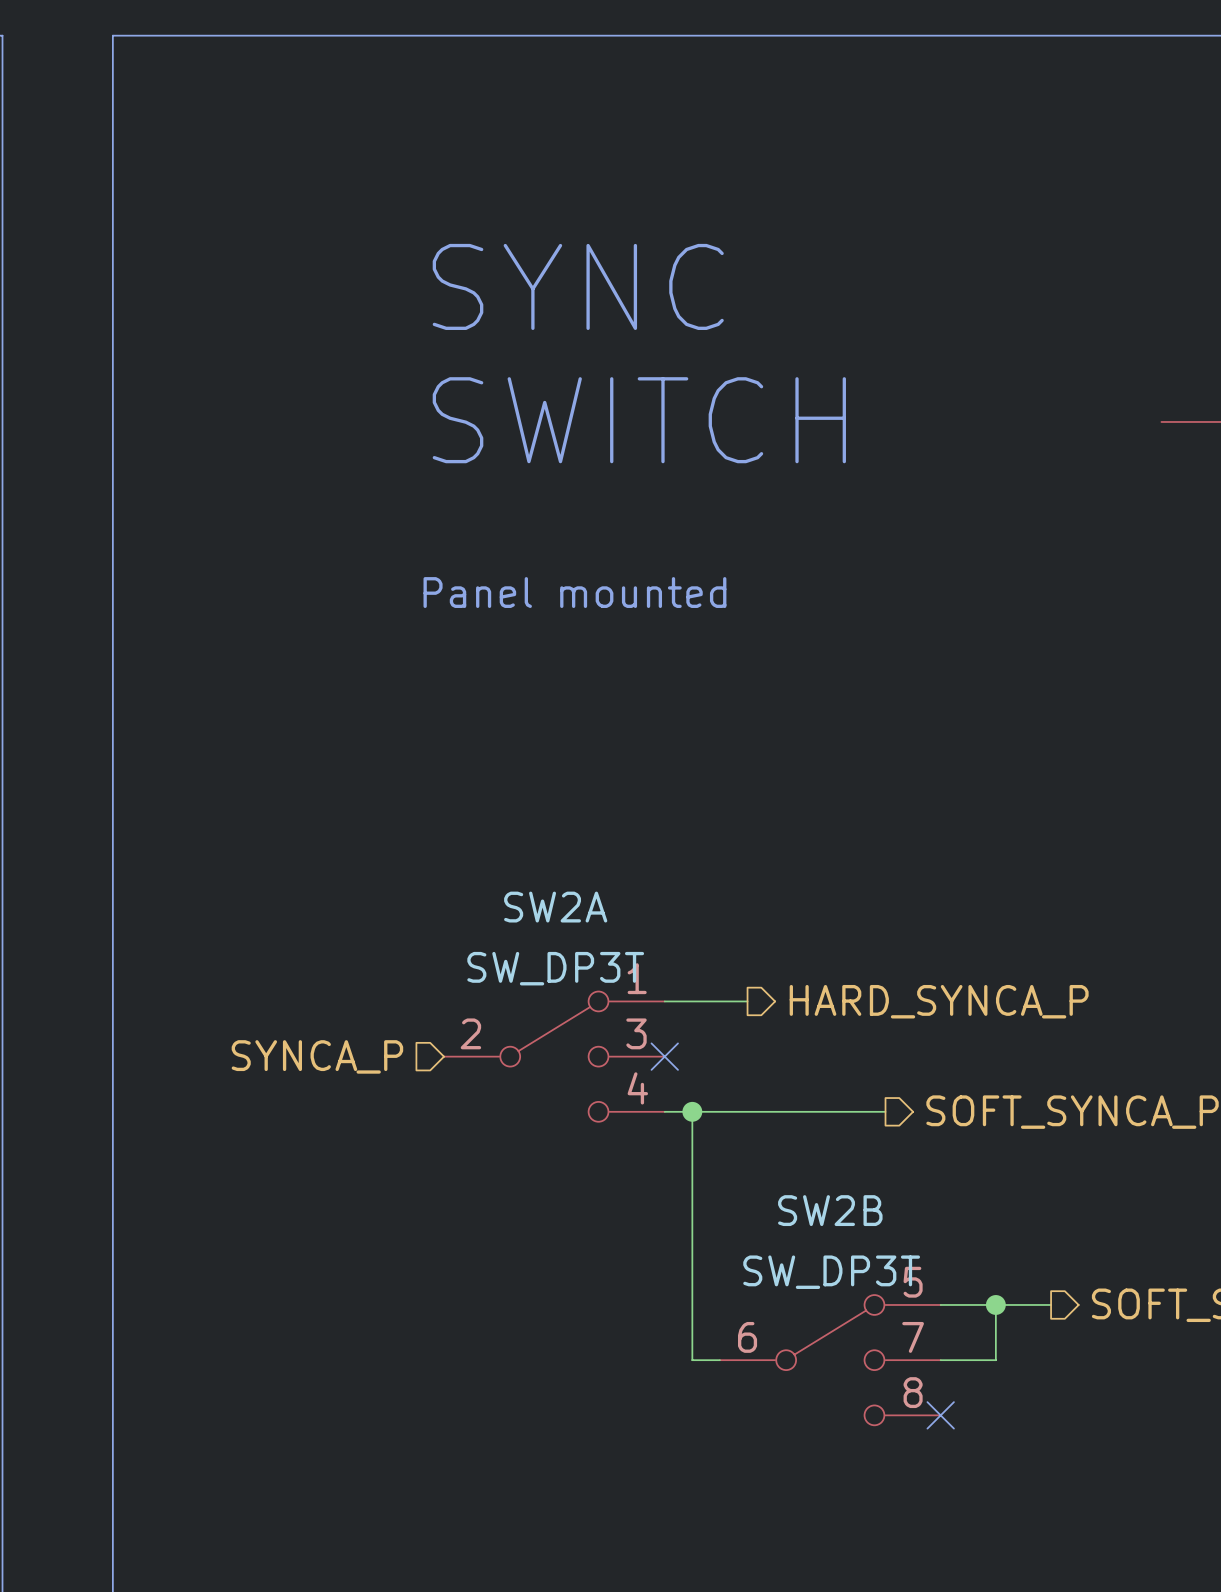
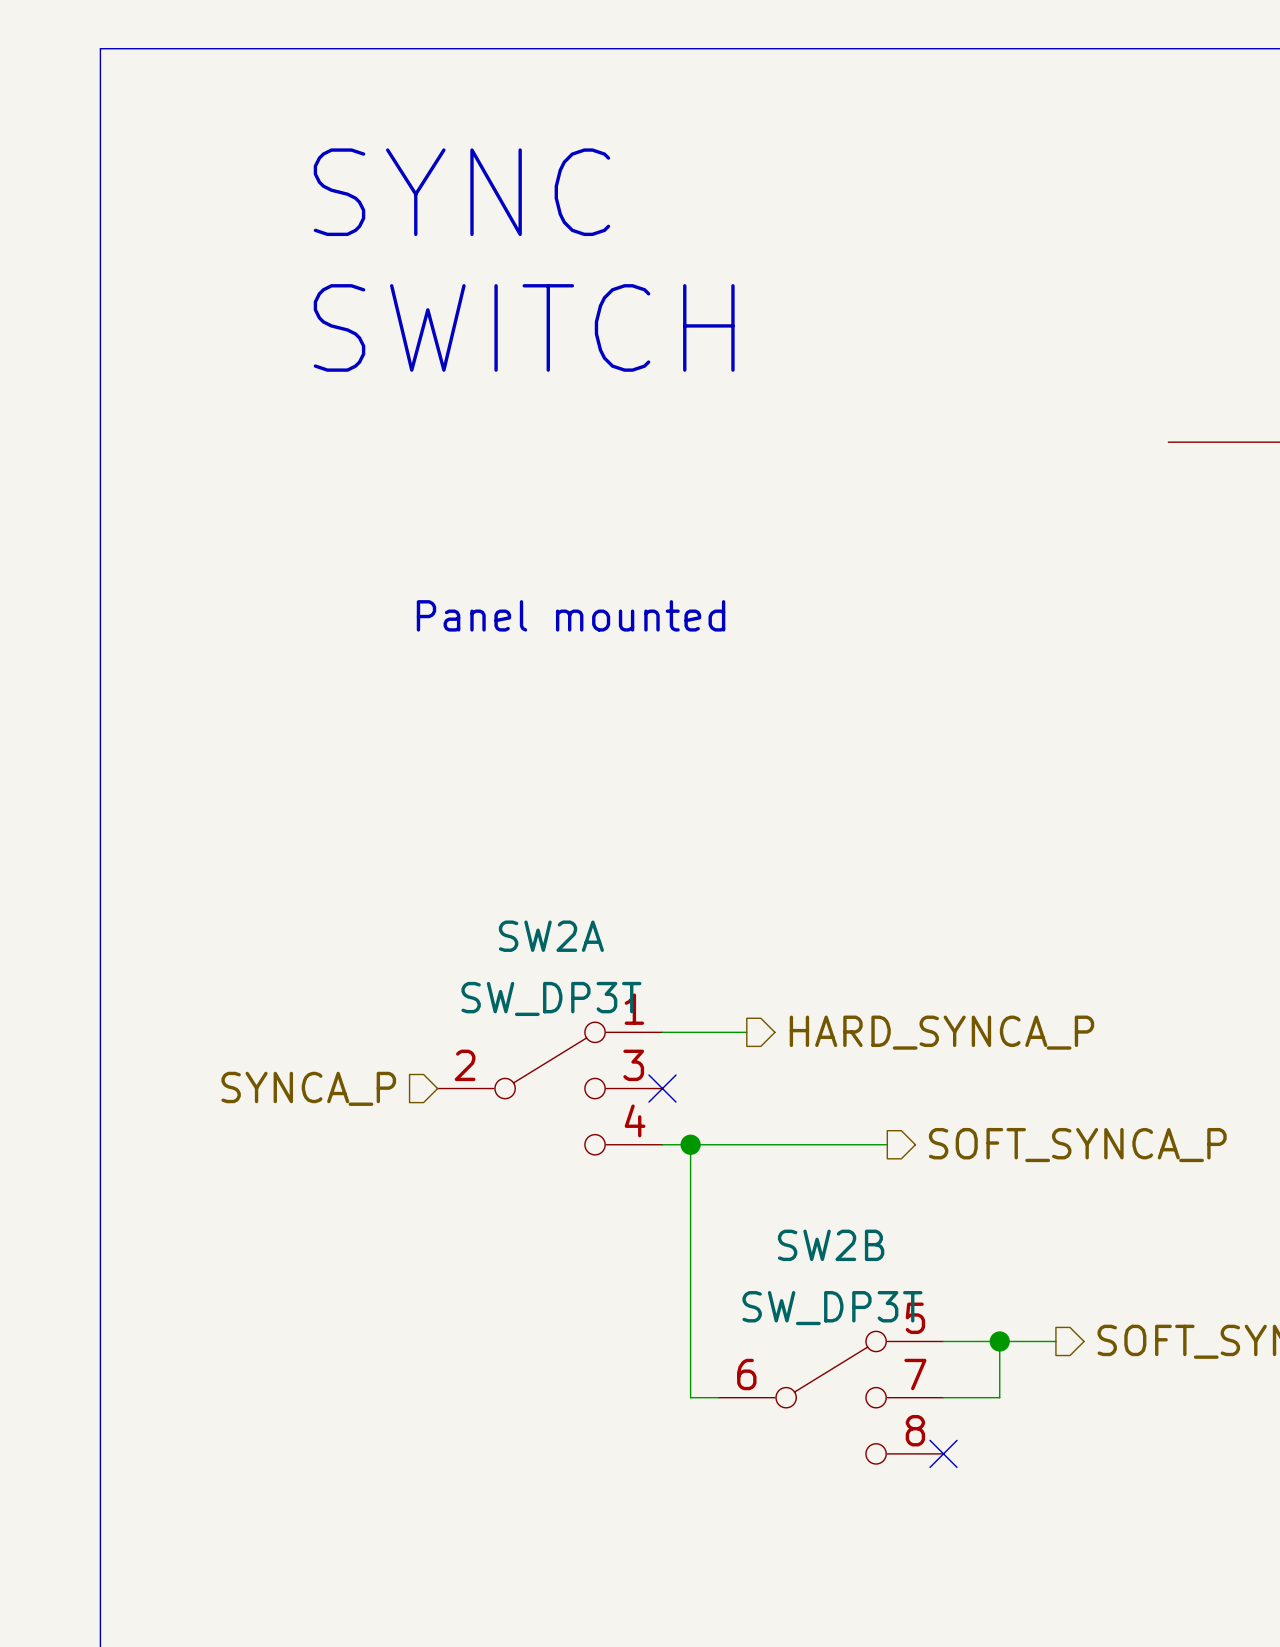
text position: SYNC (578, 286) -> SYNC (461, 192)
text position: SWITCH (639, 420) -> SWITCH (524, 327)

